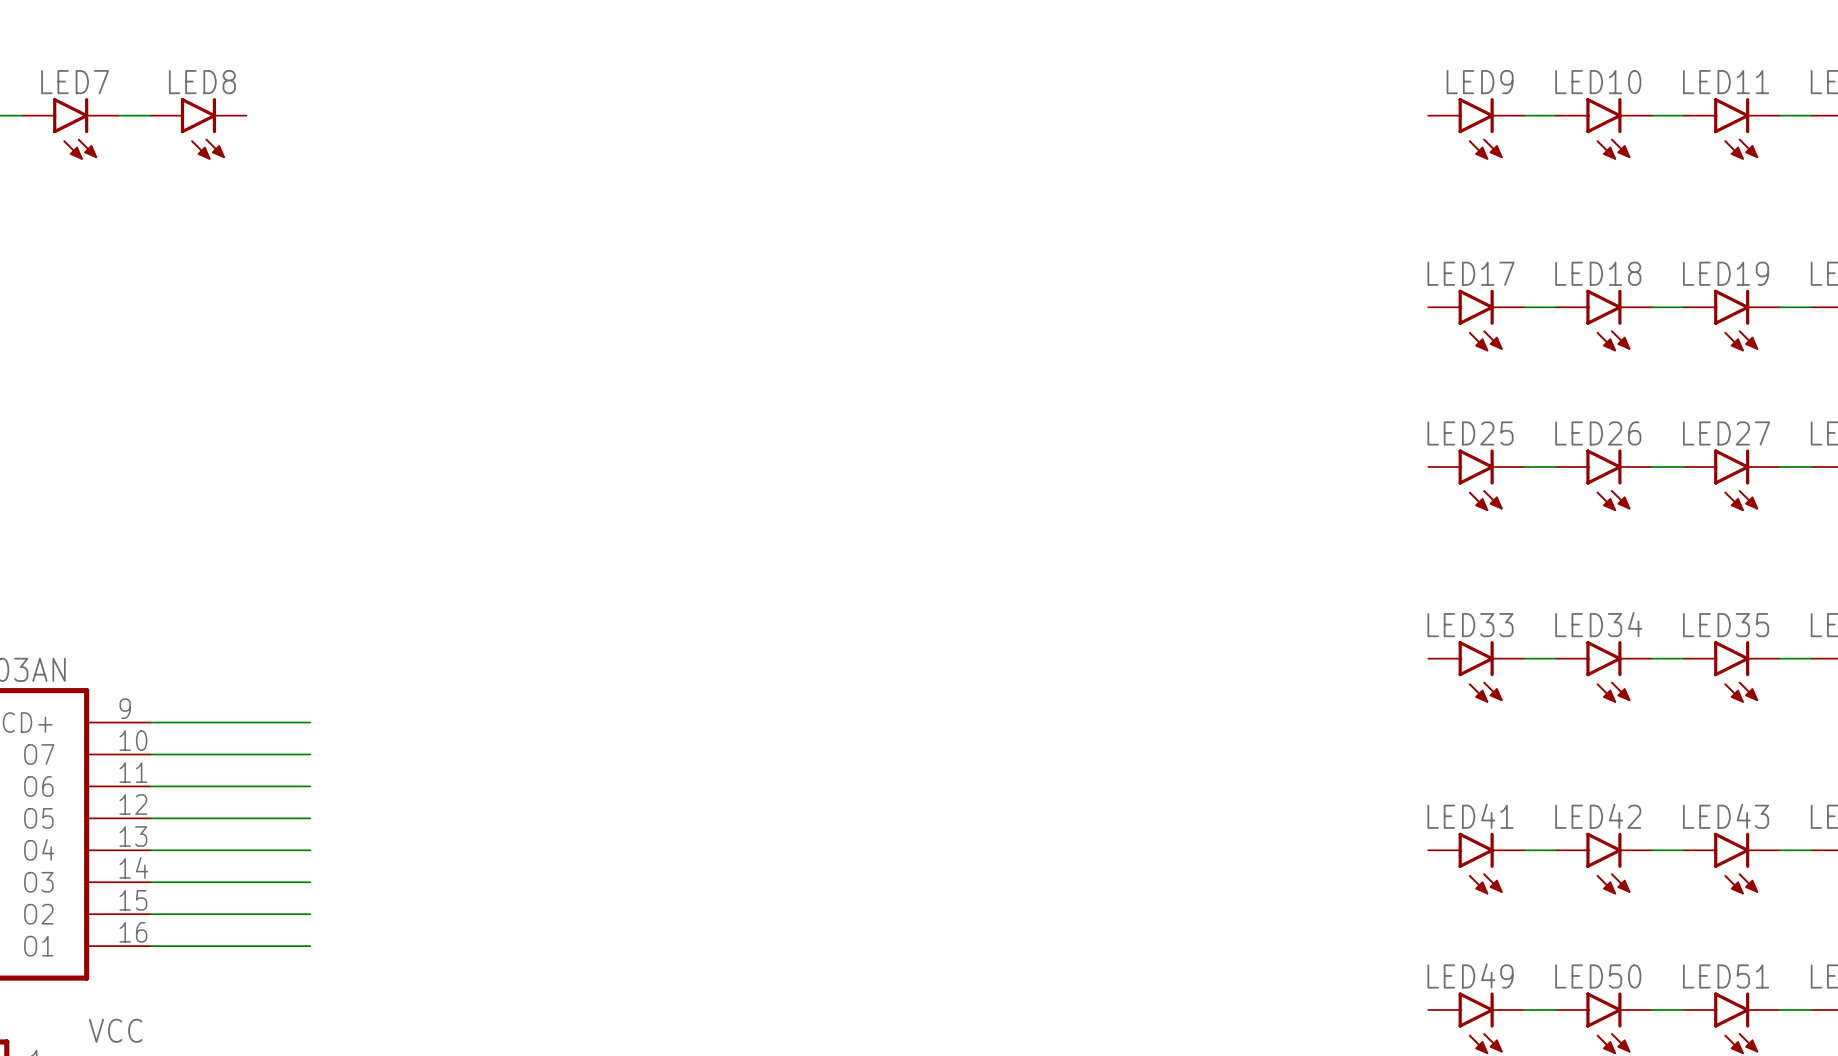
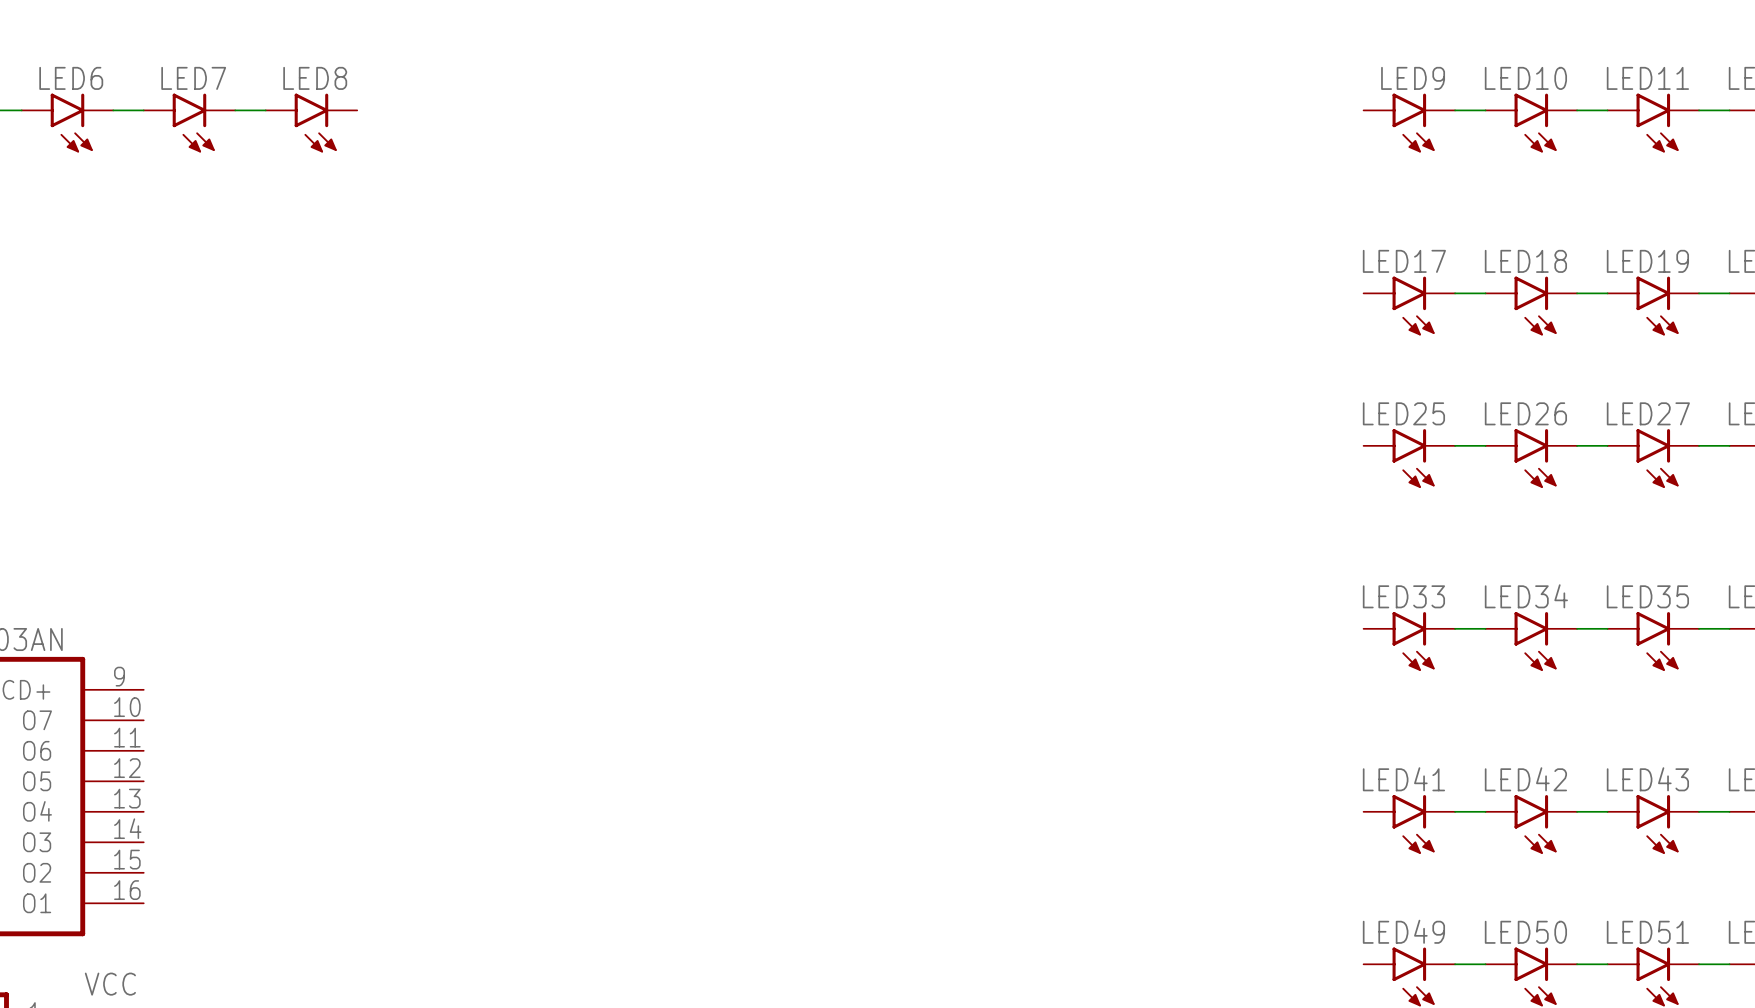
LED7 name: LED7 (75, 82) -> LED6 (71, 78)
LED8 name: LED8 (202, 82) -> LED7 (193, 78)
wire: none -> (235, 110) (265, 110)
LED8: none -> (311, 123)
wire: (150, 722) (310, 722) -> none
wire: (150, 754) (310, 754) -> none
wire: (150, 786) (310, 786) -> none
wire: (150, 818) (310, 818) -> none
wire: (150, 850) (310, 850) -> none
wire: (150, 882) (310, 882) -> none
wire: (150, 914) (310, 914) -> none
wire: (150, 946) (310, 946) -> none

